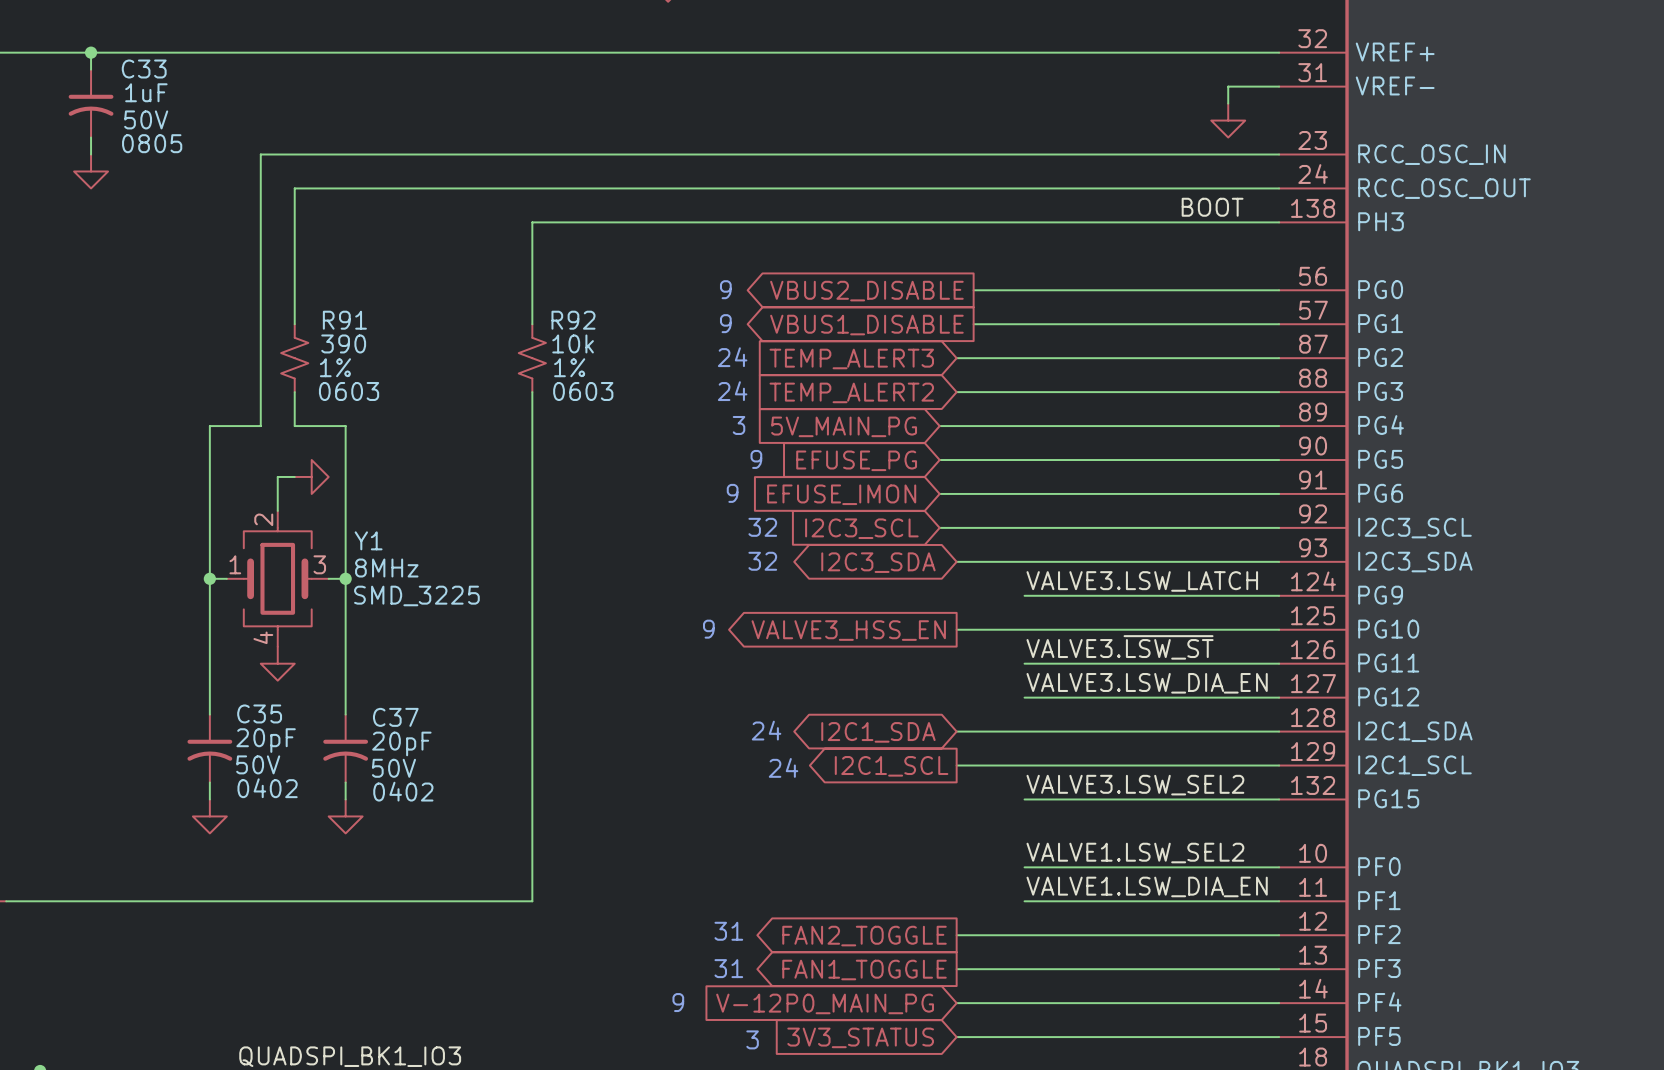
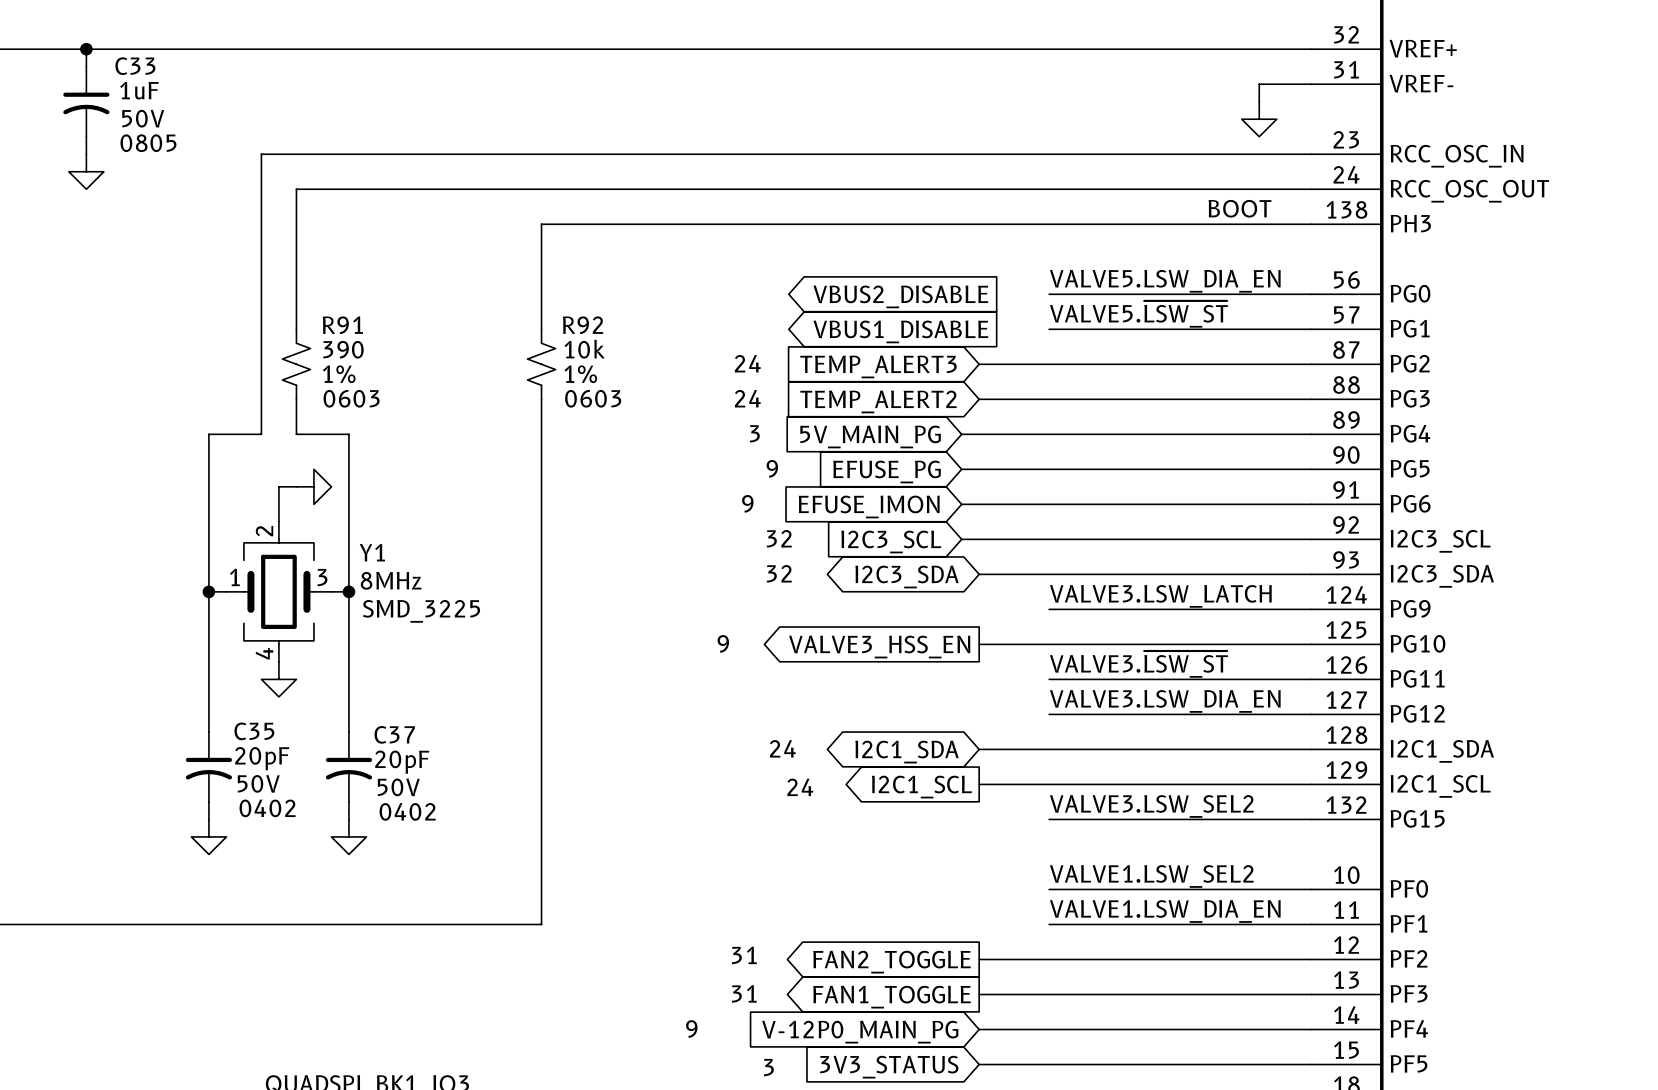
label: none -> VALVE5.LSW_DIA_EN (1165, 281)
text: 9 (725, 289) -> none
wire: (973, 290) (1024, 290) -> none
label: none -> VALVE5.~{LSW_ST} (1138, 314)
text: 9 (725, 323) -> none
wire: (973, 324) (1024, 324) -> none

